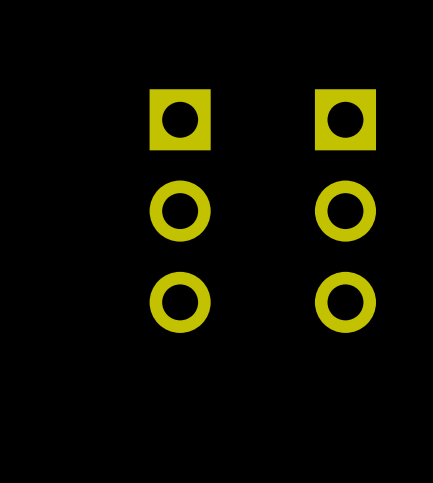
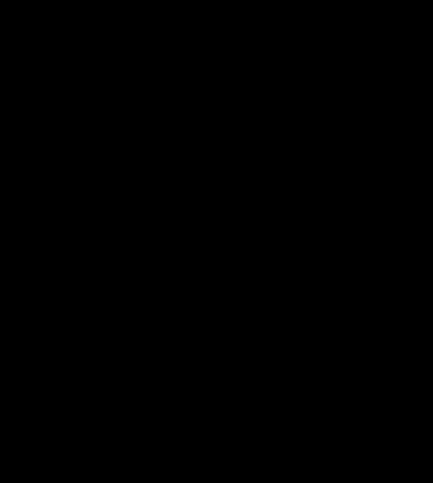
part: (180, 211) -> none
part: (345, 211) -> none

